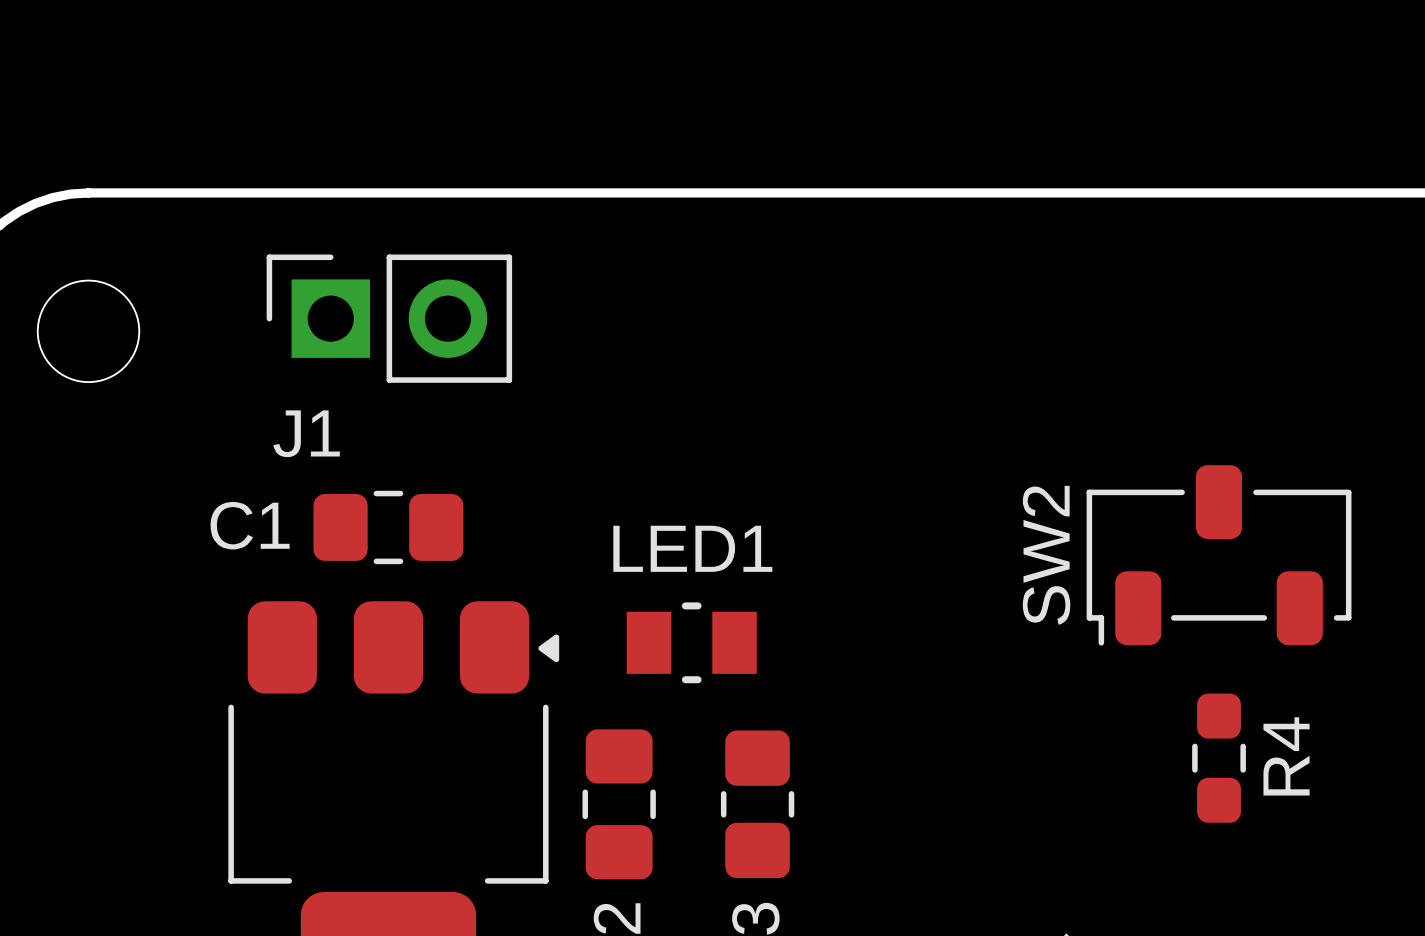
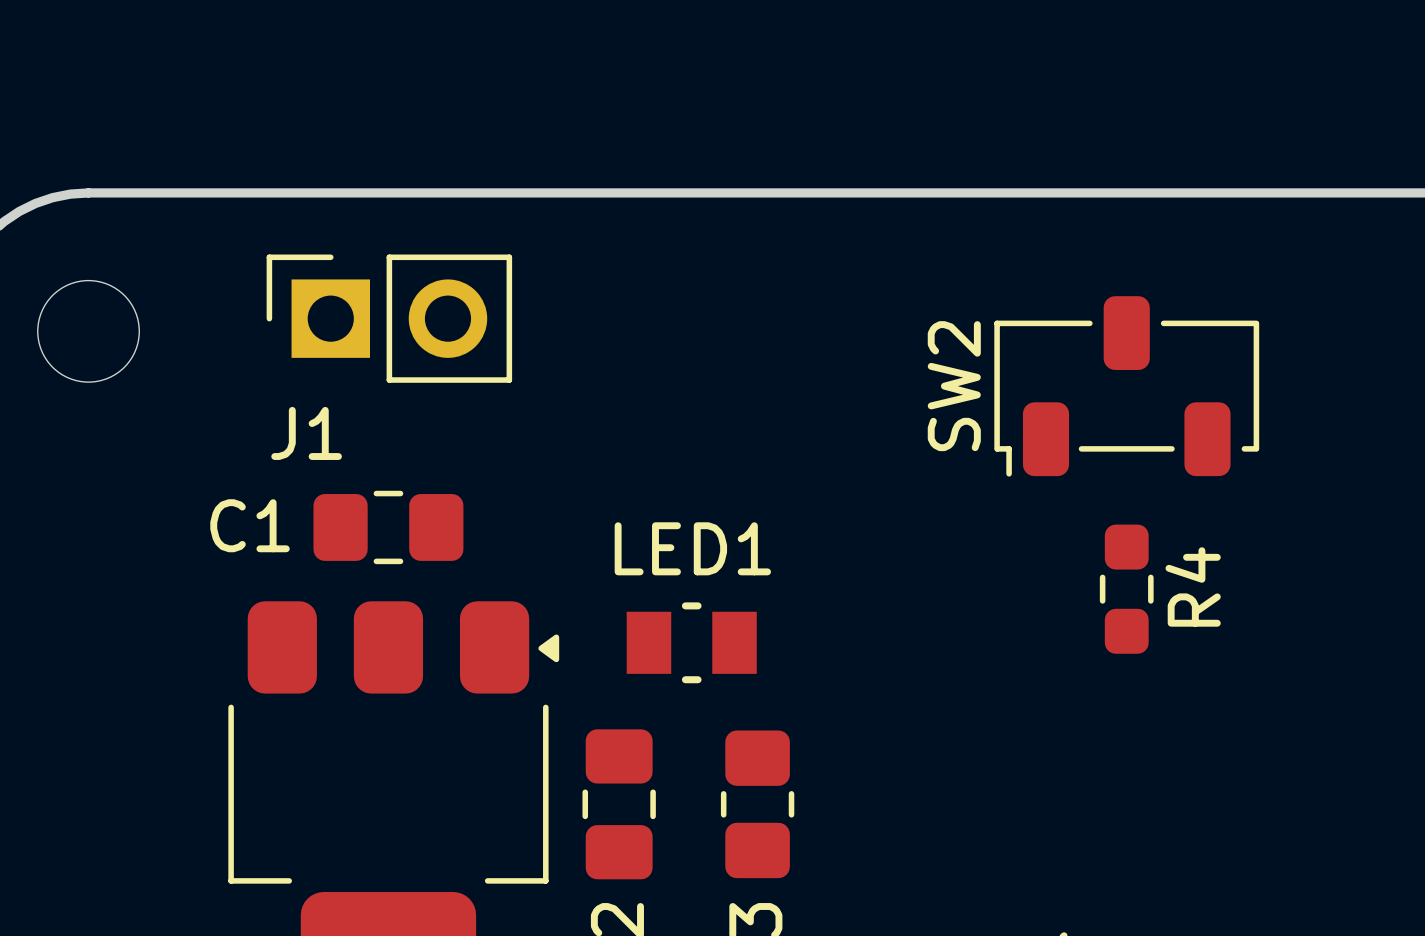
SW2 position: (1219, 555) -> (1126, 386)
R4 position: (1219, 758) -> (1126, 589)

